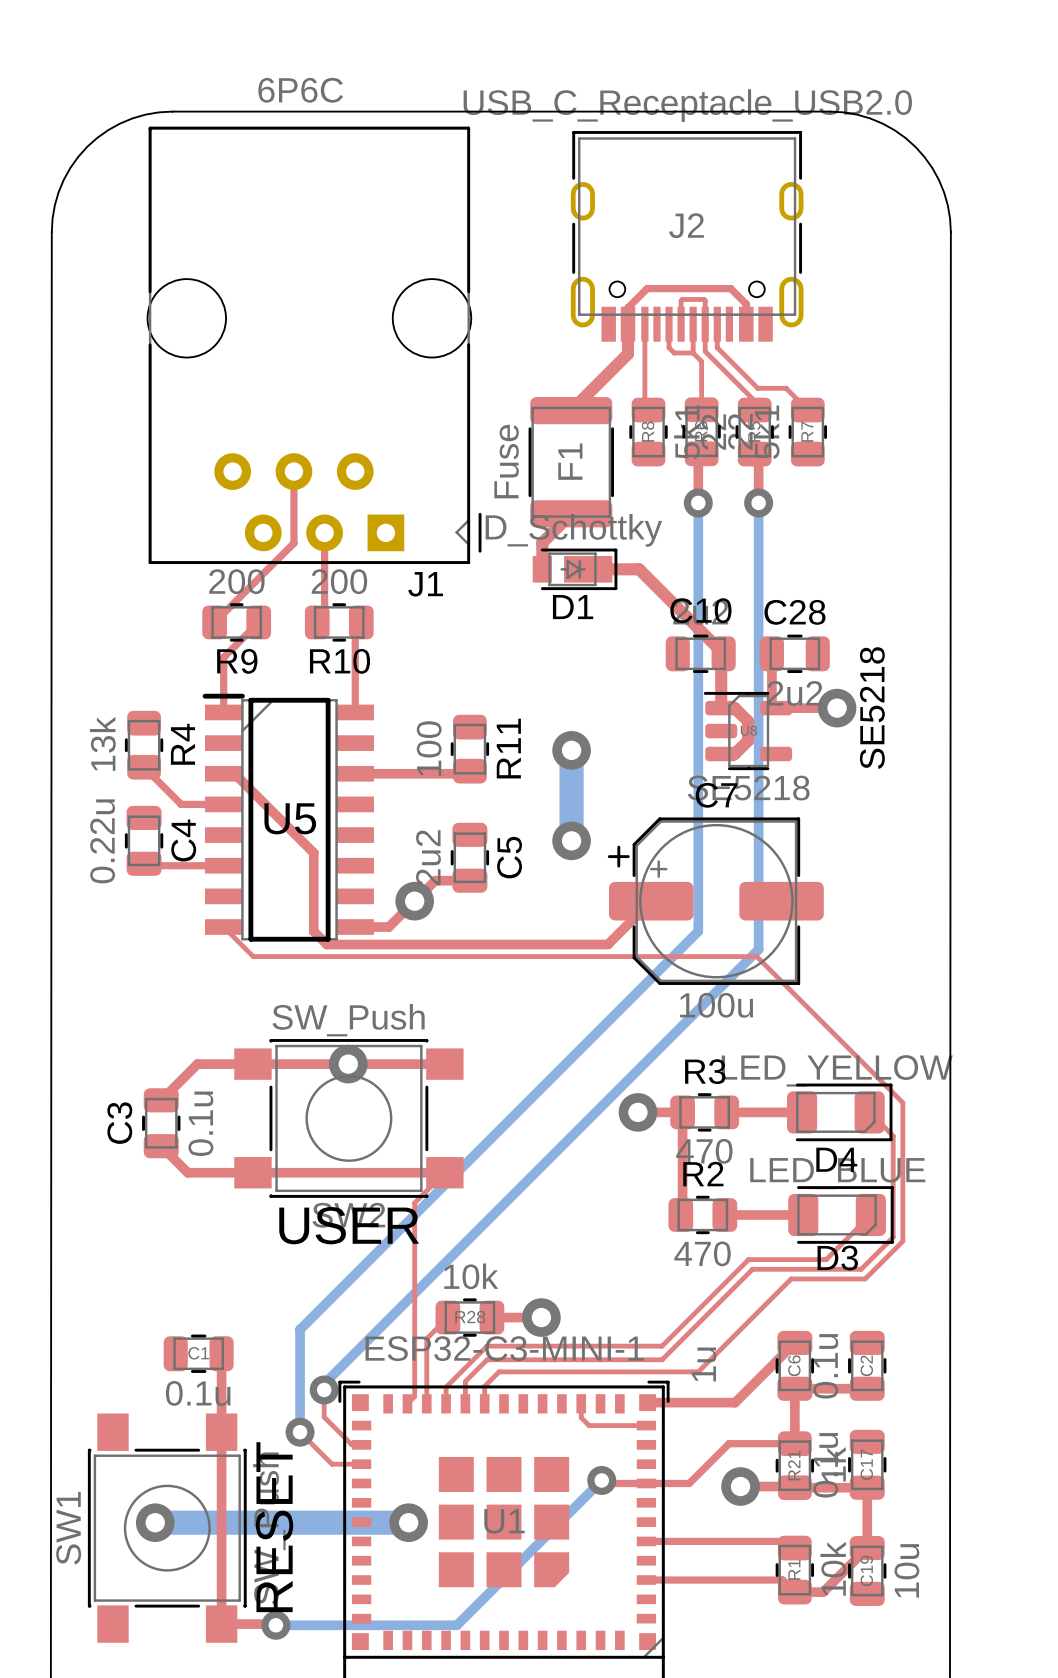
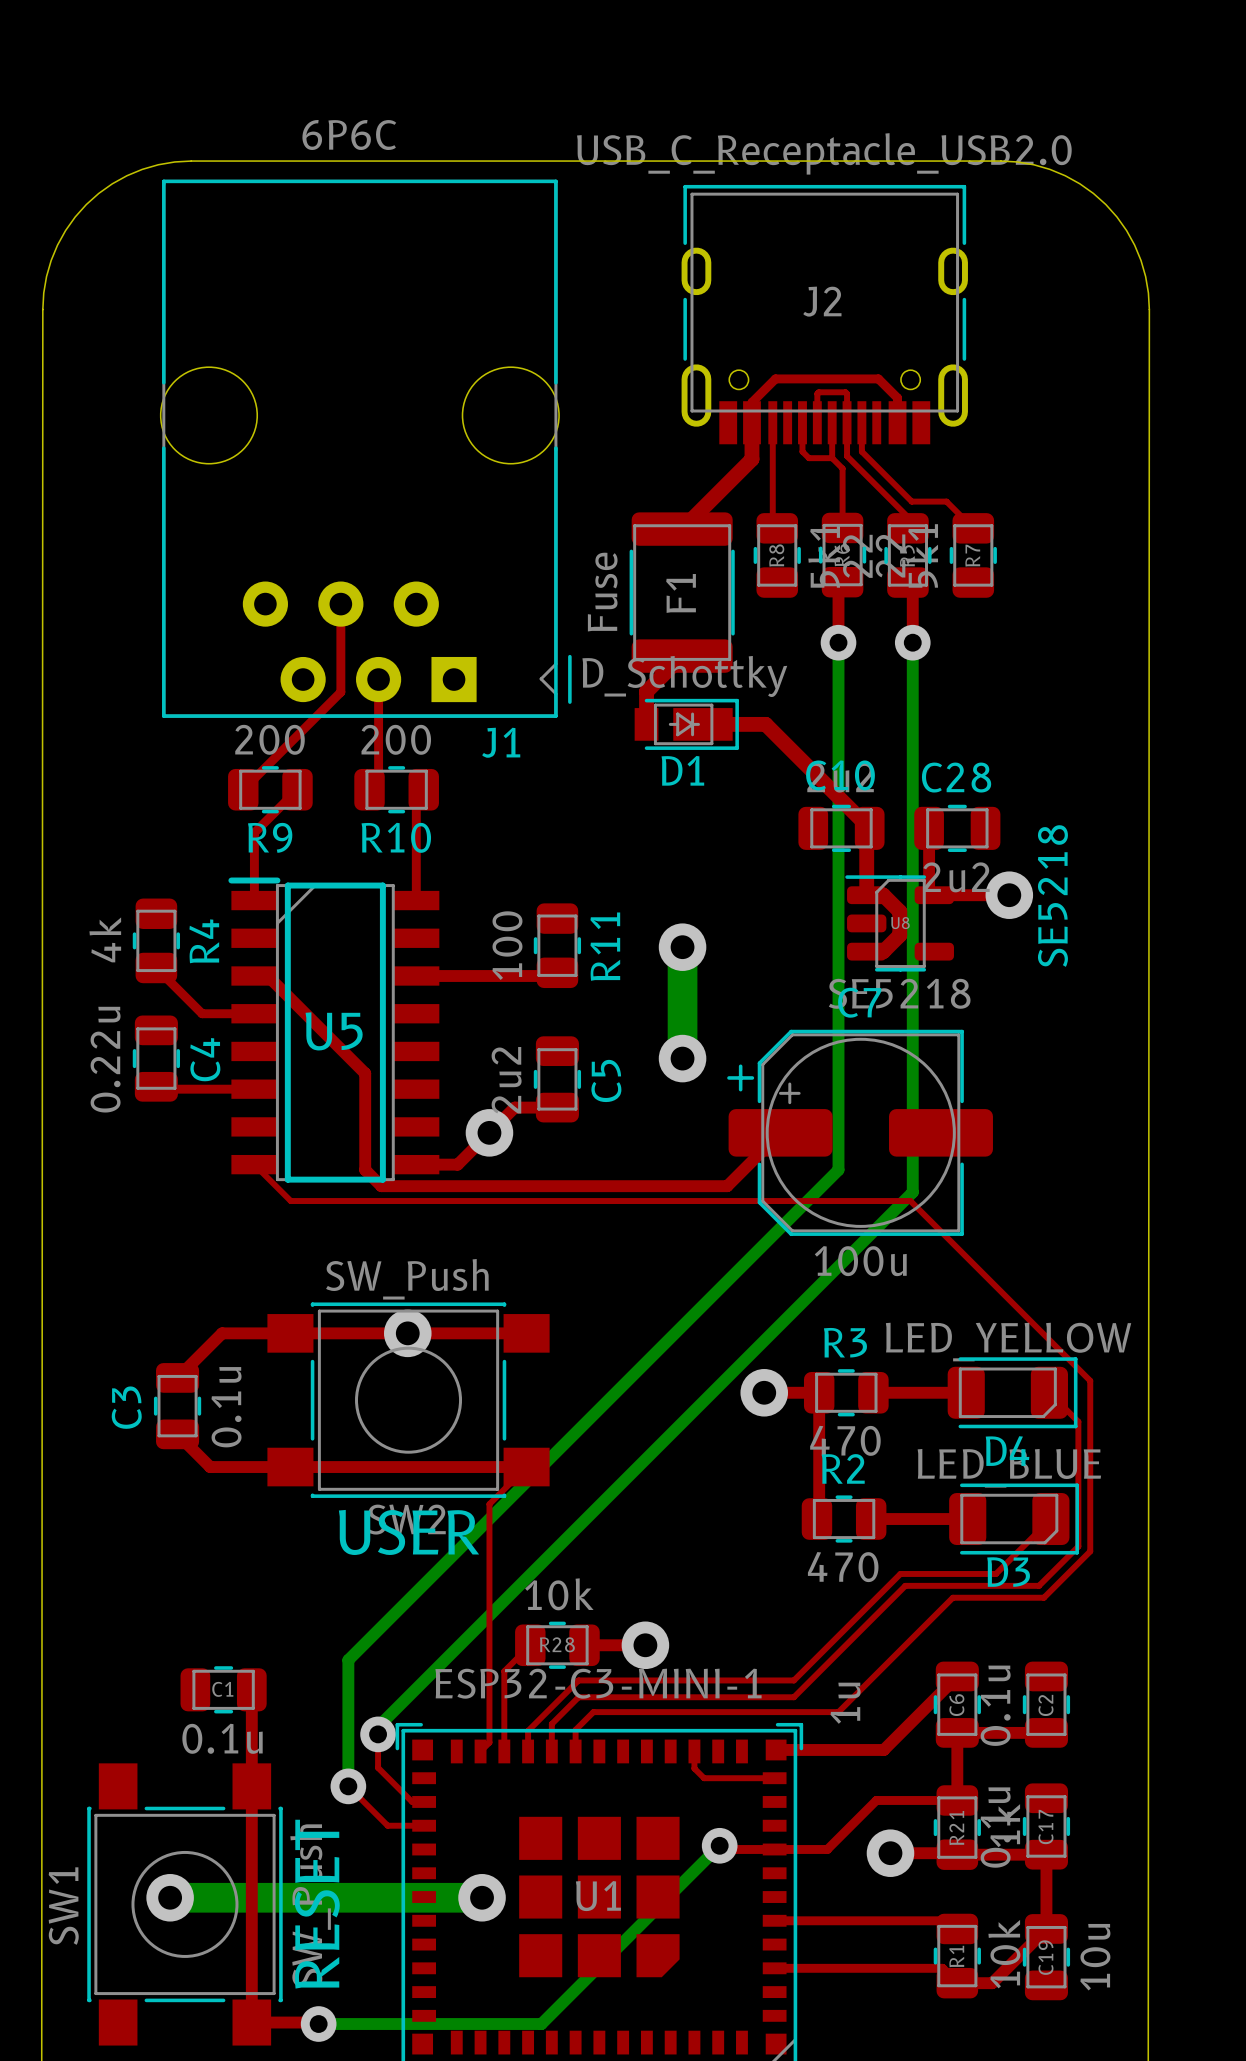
R4 value: 13k (102, 743) -> 4k (105, 939)

